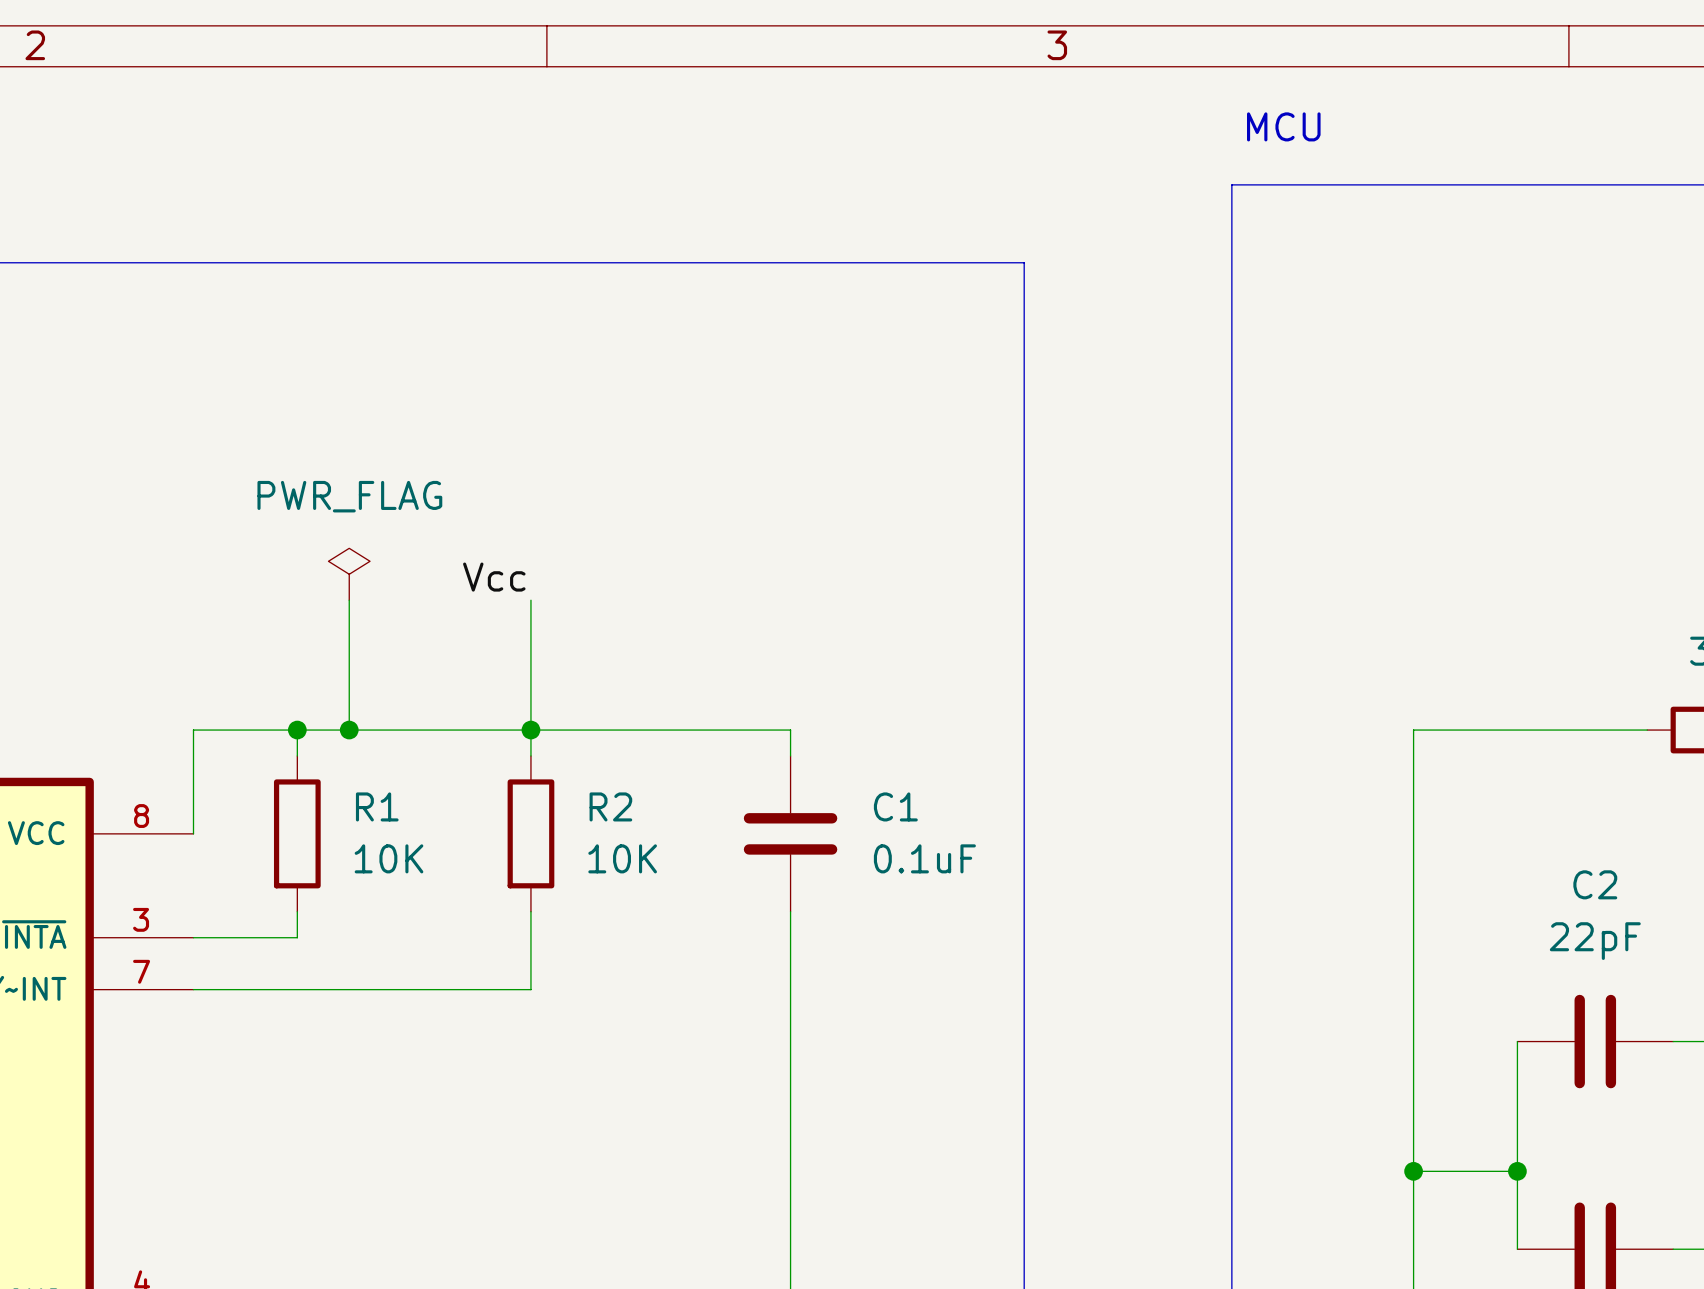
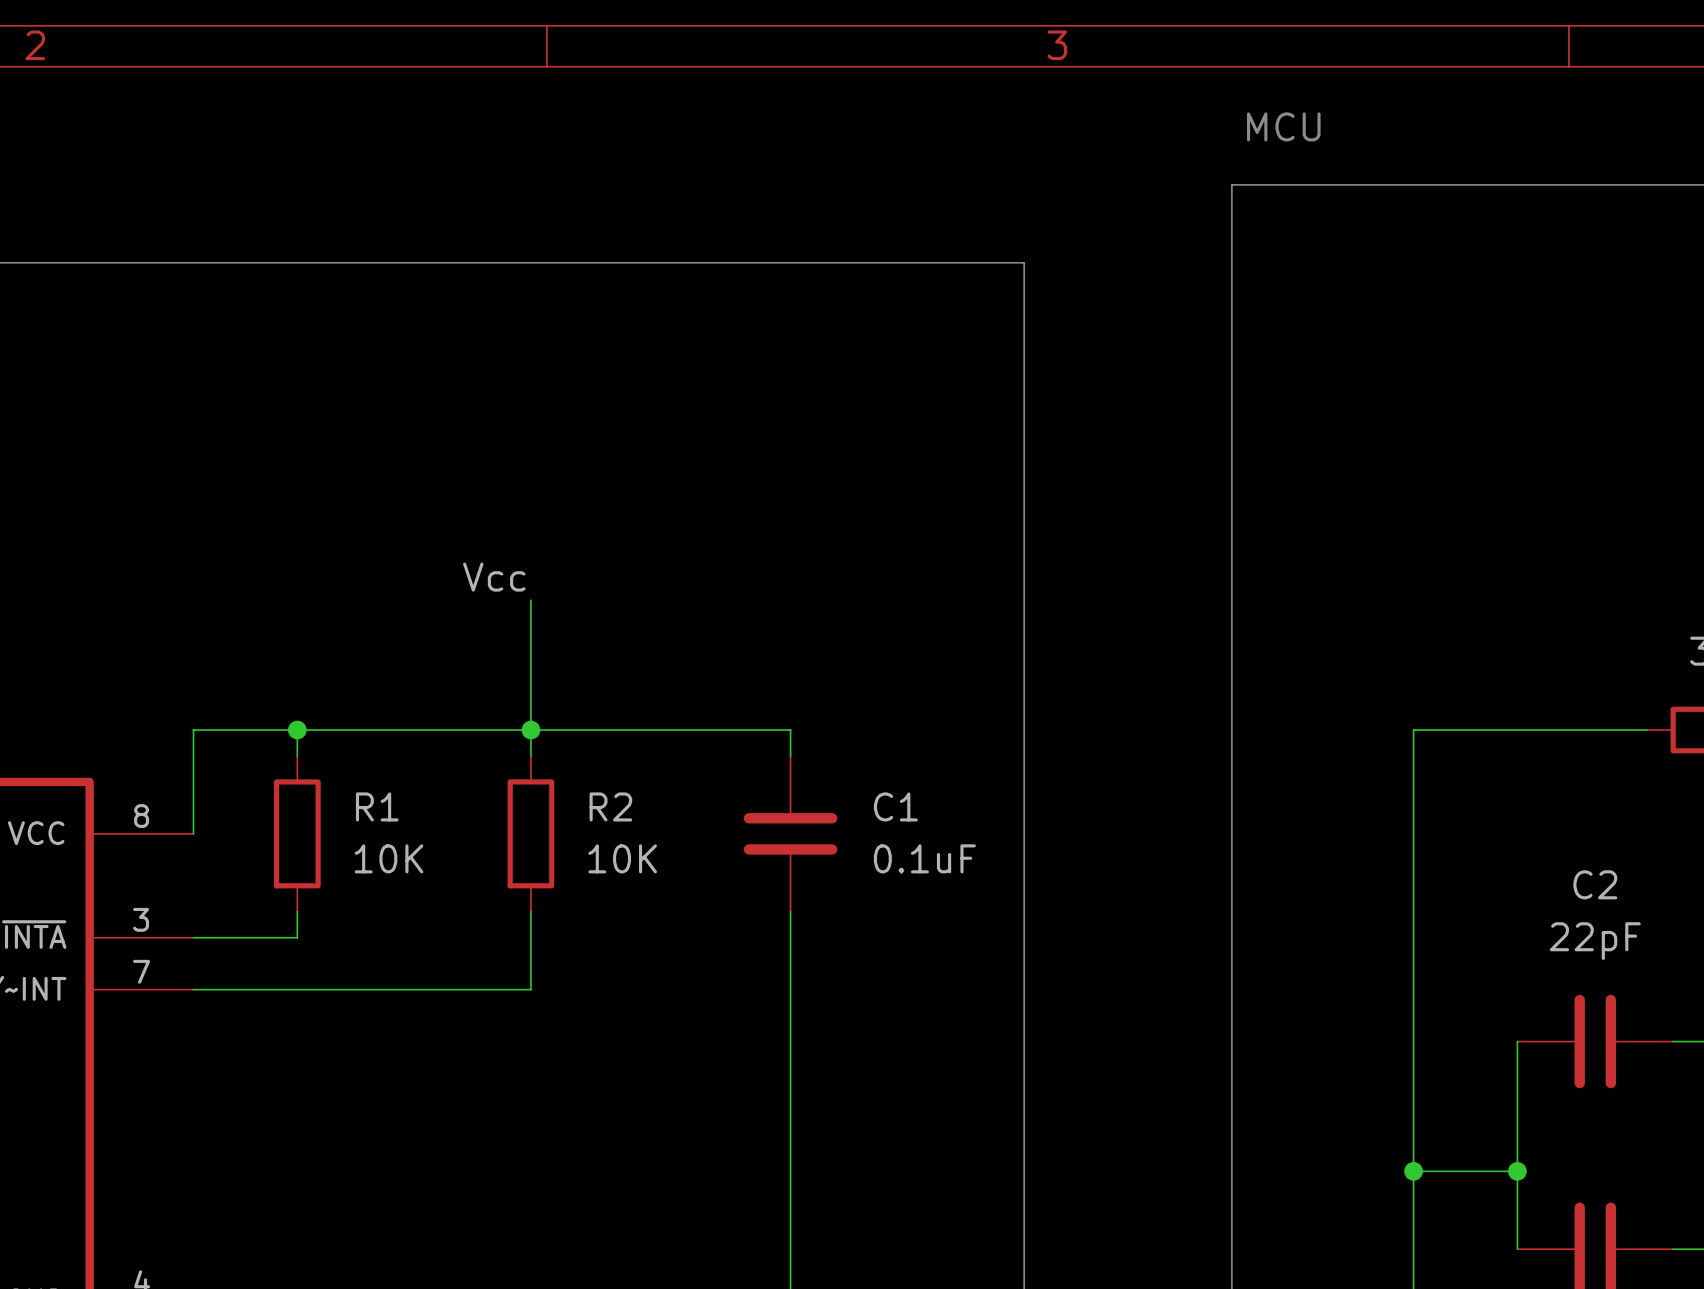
power symbol: PWR_FLAG (349, 574) -> none
wire: (349, 600) (349, 730) -> none
junction: (349, 730) -> none

